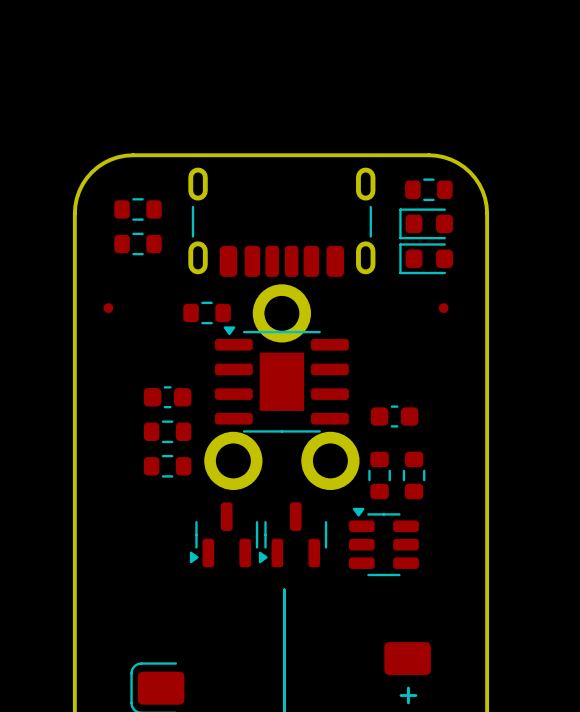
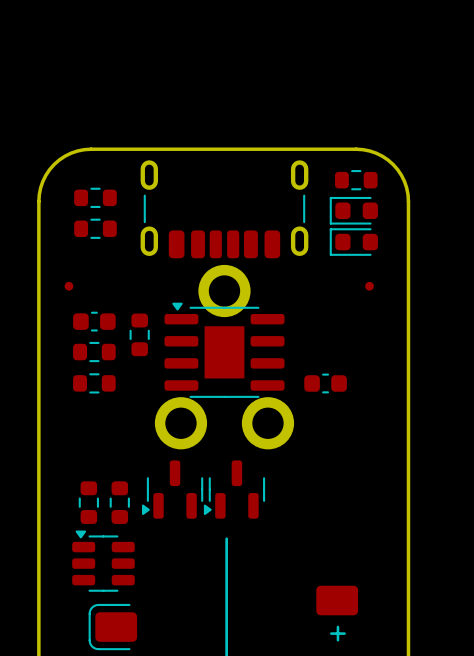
part: (207, 312) -> none
part: none -> (139, 334)
part: none -> (94, 352)
part position: (167, 397) -> (94, 321)
part: none -> (94, 383)
part: (167, 431) -> none
part: (167, 466) -> none
part: (379, 475) -> none
part: (414, 475) -> none
part position: (383, 541) -> (103, 561)
part: none -> (88, 502)
part: none -> (119, 502)

